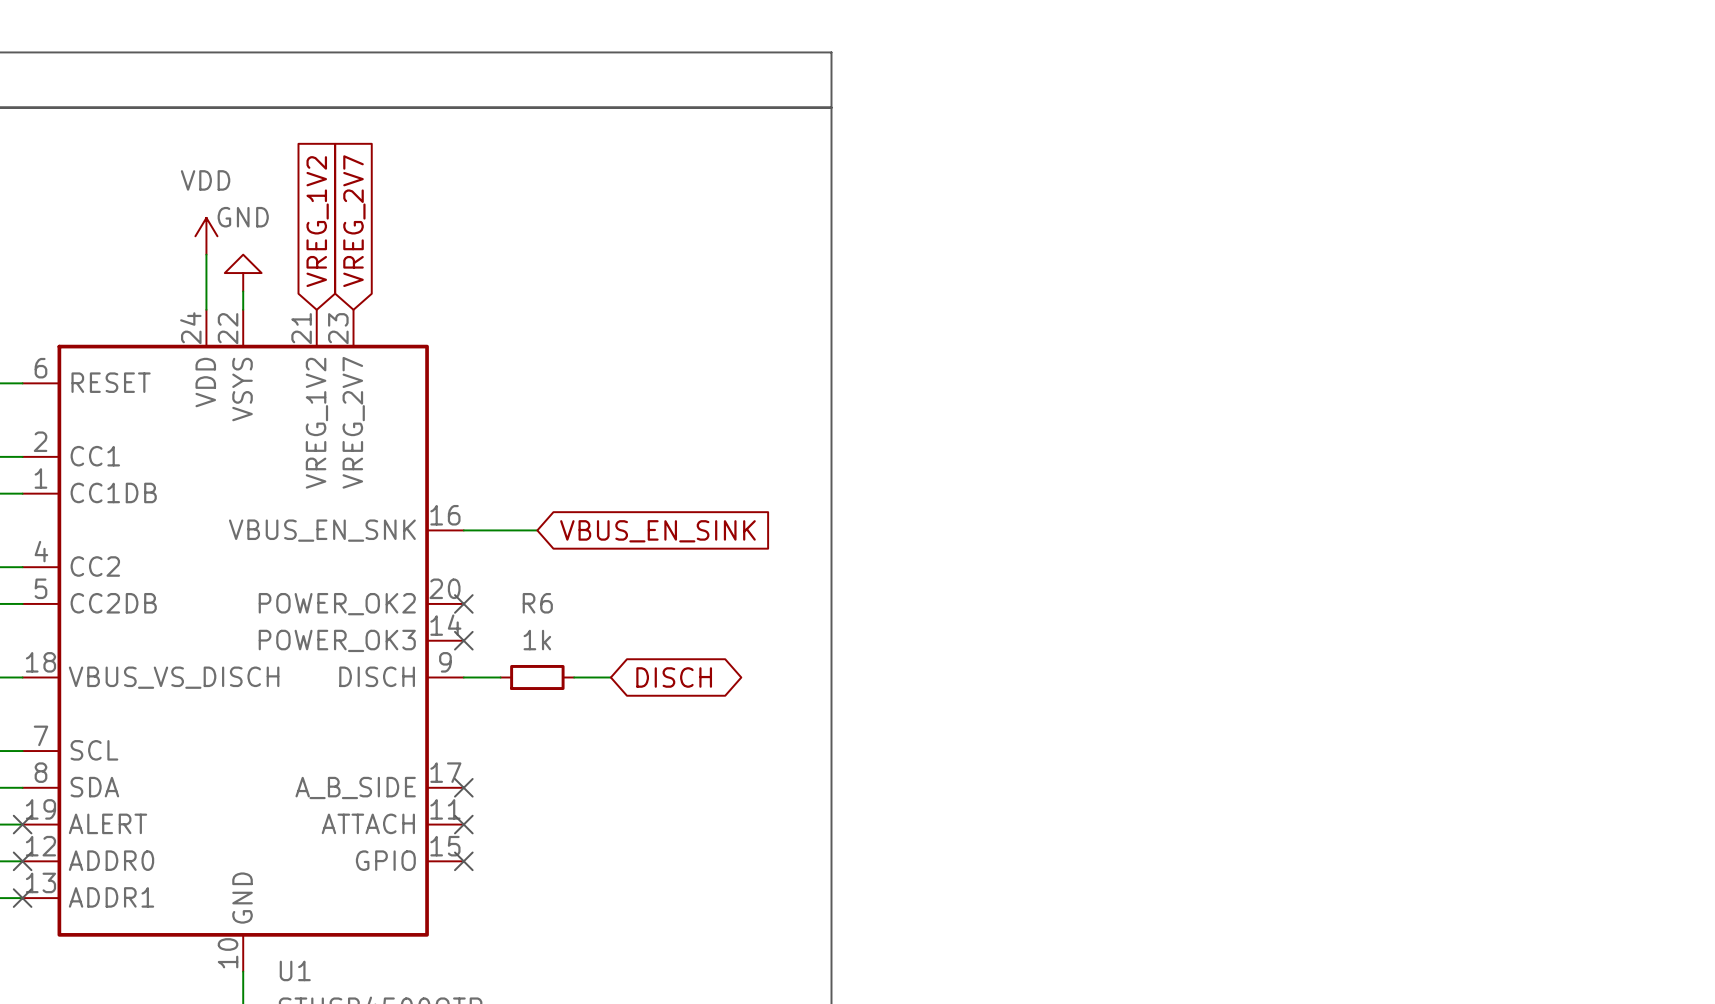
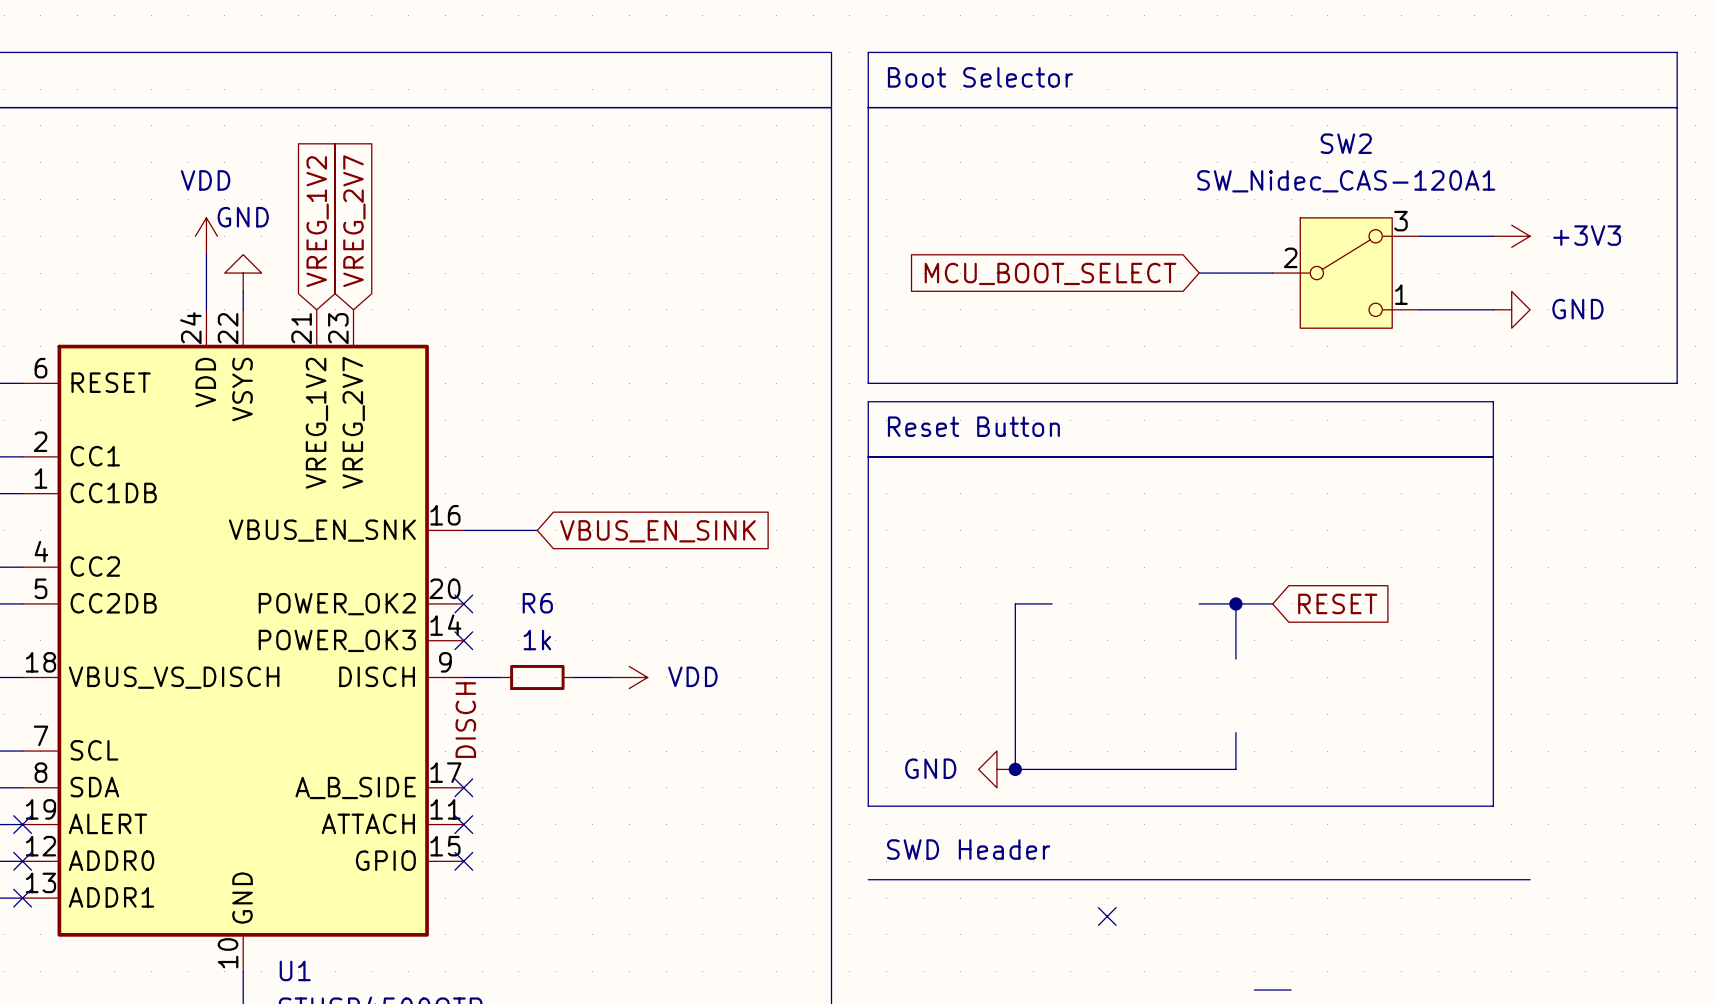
line: none -> (868, 52) (868, 383) (1677, 383) (1677, 52) (868, 52)
text: none -> Boot Selector (980, 77)
line: none -> (868, 107) (1677, 107)
wire: none -> (1419, 236) (1493, 236)
power symbol: none -> +3V3 (1511, 236)
global label: none -> MCU_BOOT_SELECT (1050, 273)
wire: none -> (1199, 273) (1272, 273)
SW2: none -> SW_Nidec_CAS-120A1 (1346, 273)
wire: none -> (1419, 309) (1493, 309)
power symbol: none -> GND (1511, 309)
line: none -> (868, 401) (868, 806) (1493, 806) (1493, 401) (868, 401)
text: none -> Reset Button (973, 426)
line: none -> (868, 456) (1493, 456)
wire: none -> (1052, 603) (1015, 603) (1015, 769) (1235, 769) (1235, 732)
wire: none -> (1199, 603) (1272, 603)
wire: none -> (1235, 603) (1235, 659)
junction: none -> (1235, 603)
global label: none -> RESET (1337, 603)
power symbol: none -> VDD (629, 677)
global label: DISCH (674, 677) -> none
label: none -> DISCH (465, 720)
power symbol: none -> GND (996, 769)
junction: none -> (1015, 769)
text: none -> SWD Header (968, 849)
line: none -> (868, 879) (1530, 879)
no-connect mark: none -> (1107, 916)
wire: none -> (1254, 990) (1291, 990)

